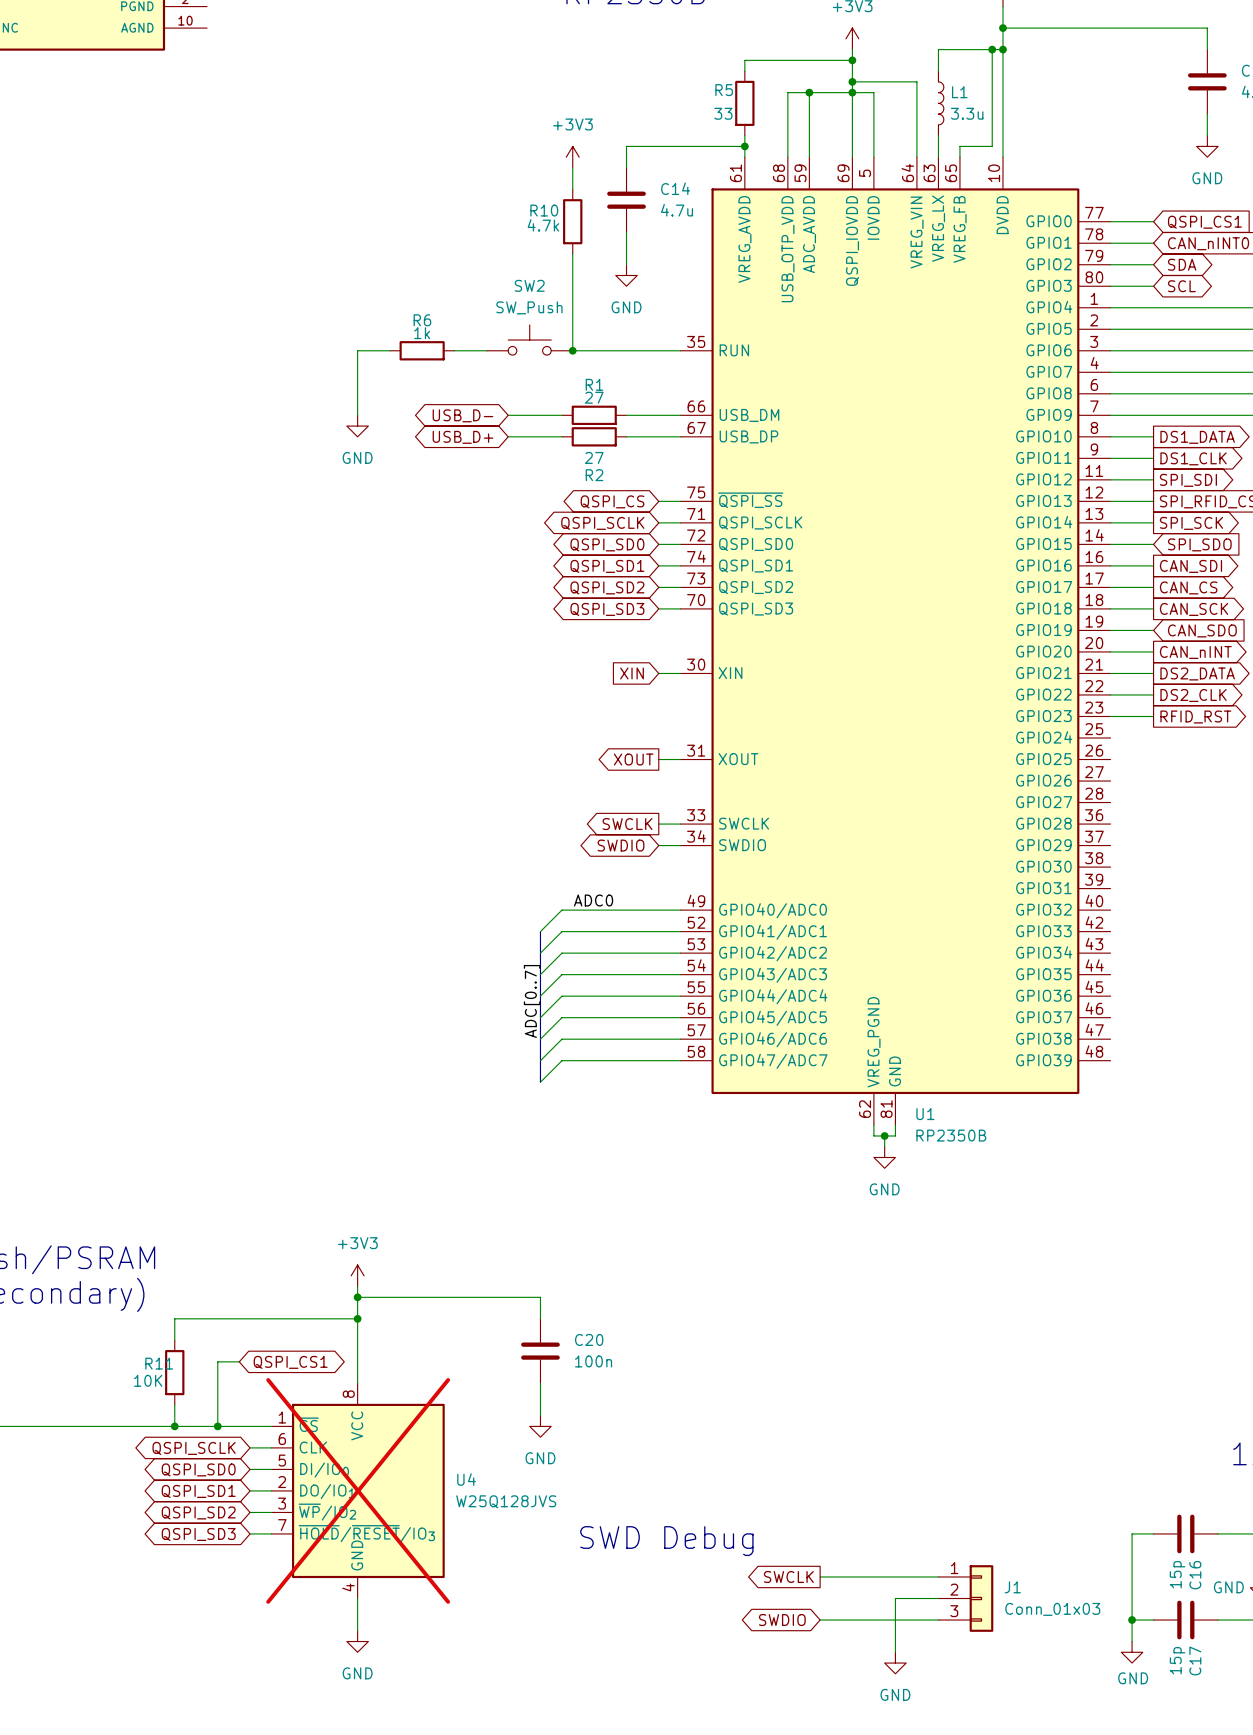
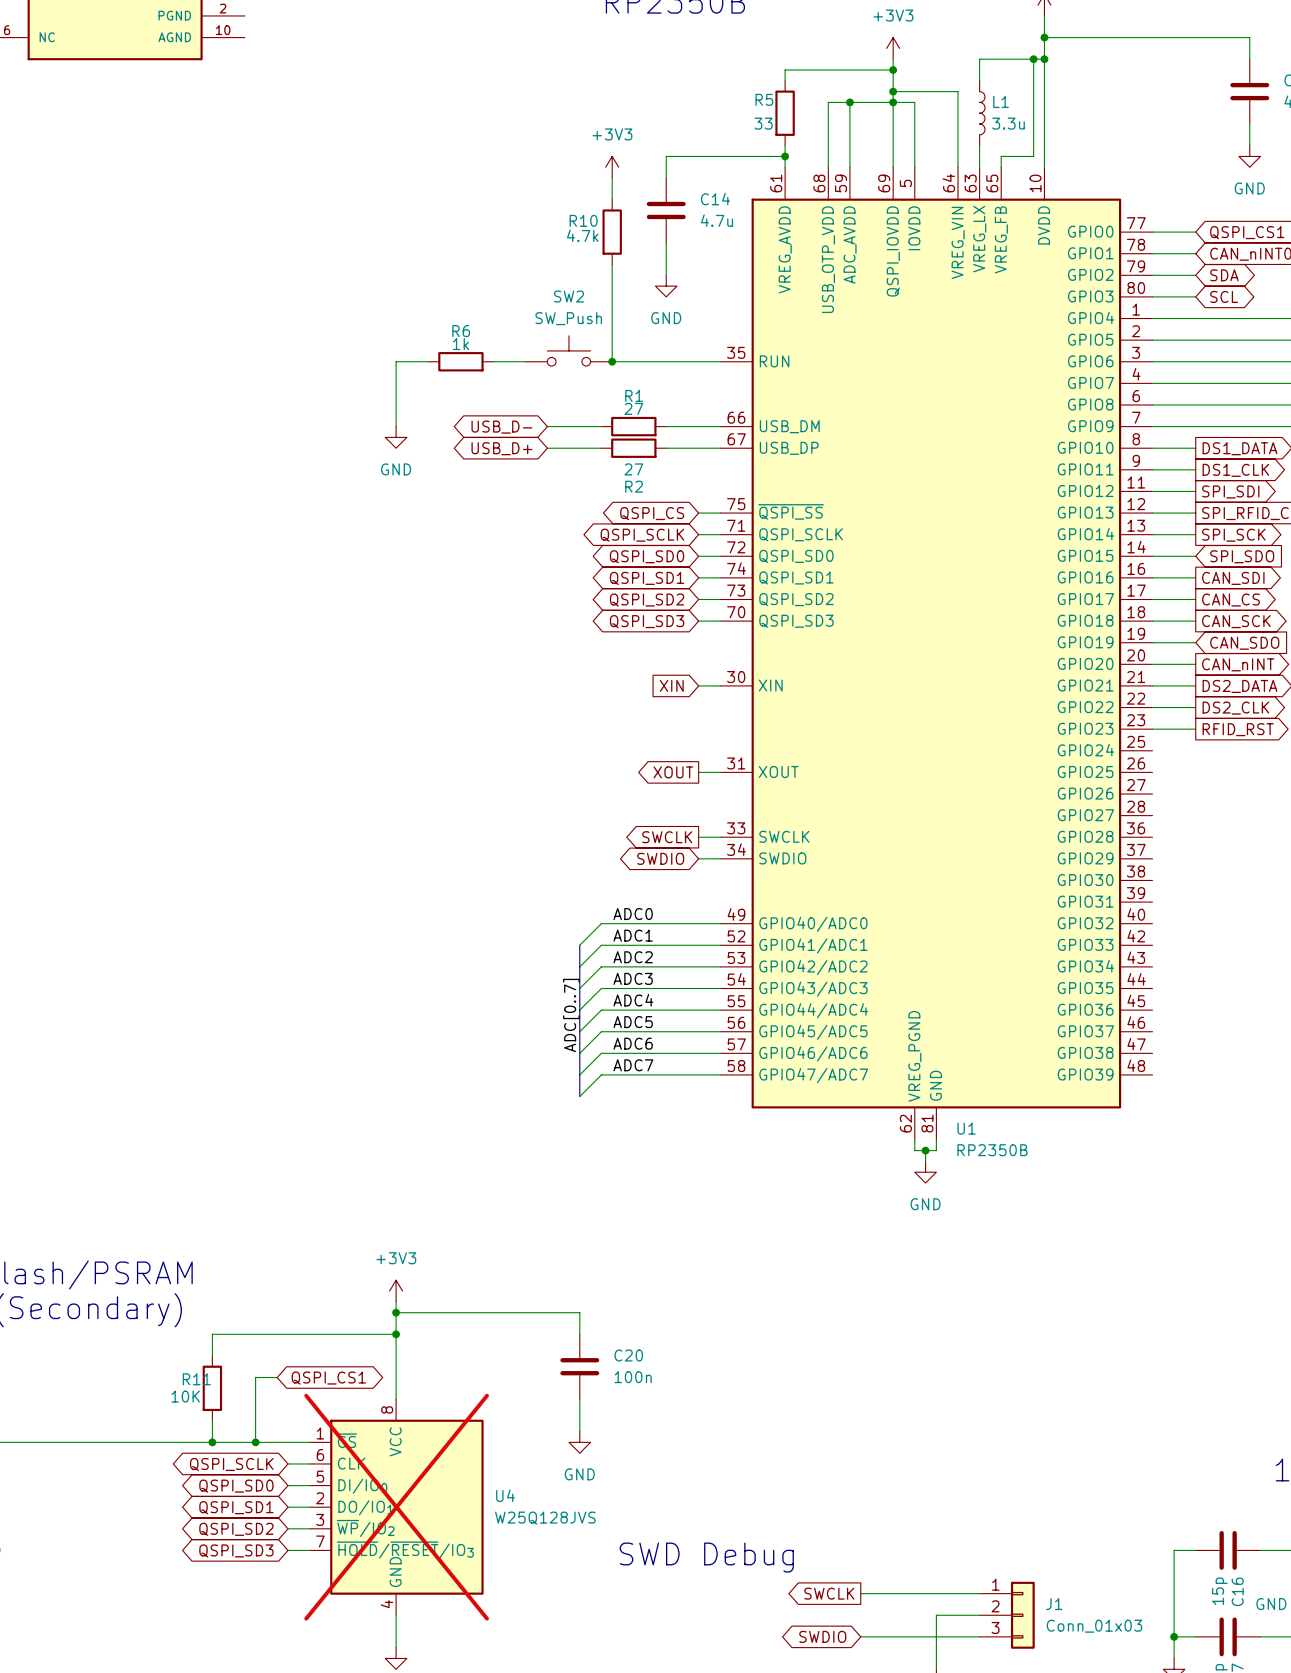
label: none -> ADC1 (633, 935)
label: none -> ADC2 (633, 957)
label: none -> ADC3 (633, 978)
label: none -> ADC4 (633, 1000)
label: none -> ADC5 (633, 1022)
label: none -> ADC6 (633, 1043)
label: none -> ADC7 (633, 1065)

